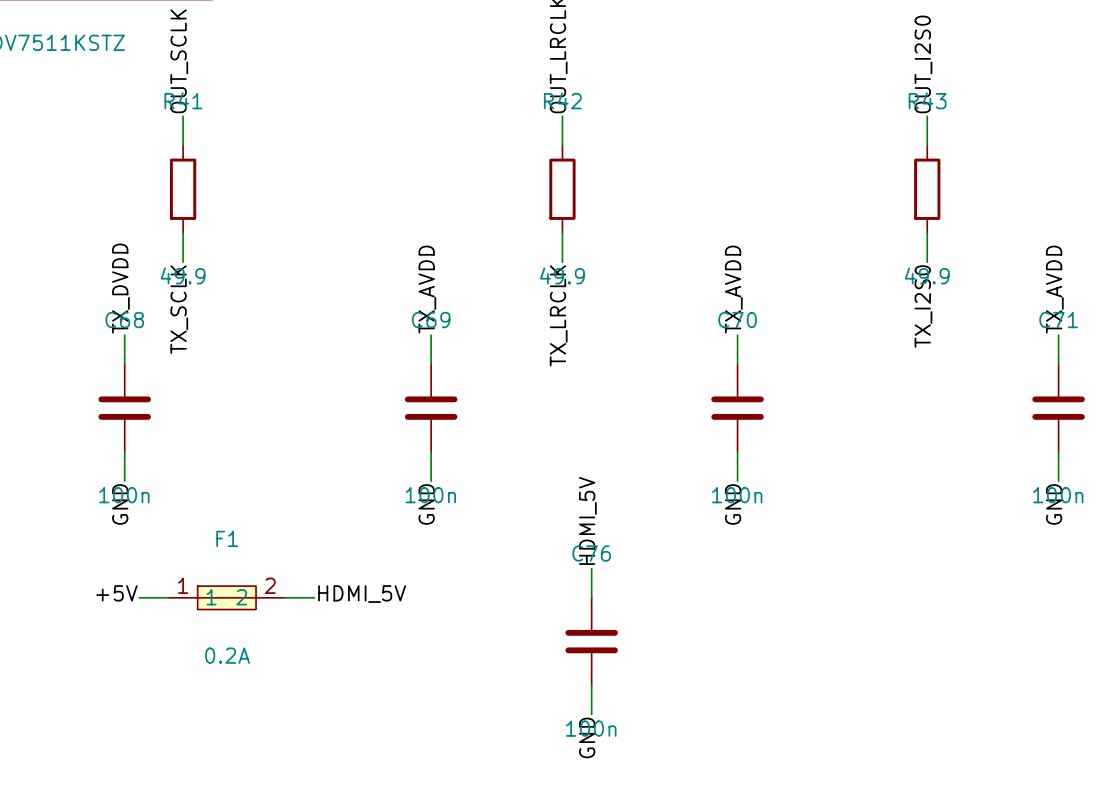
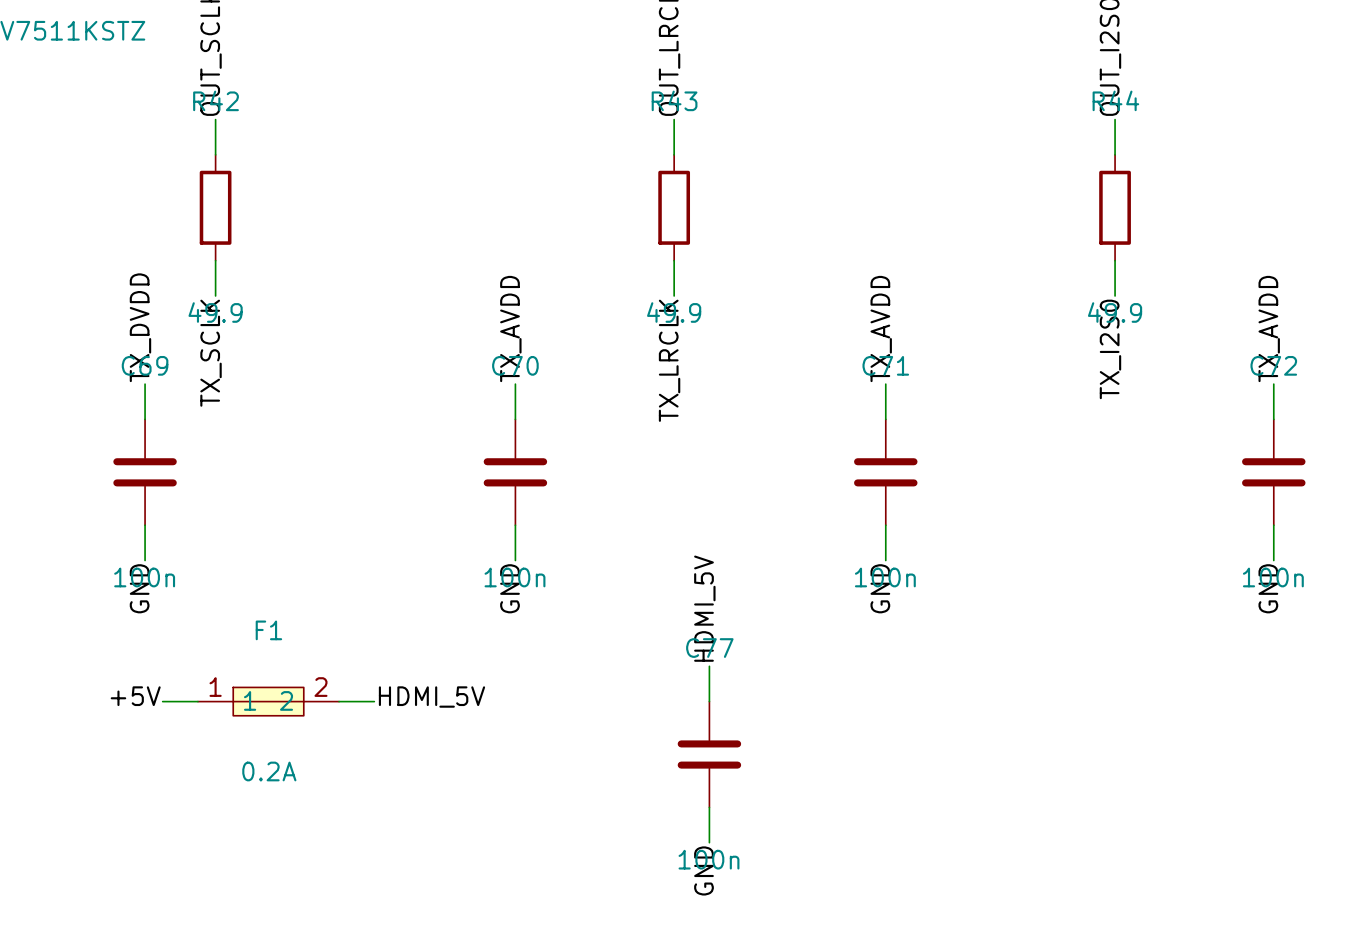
R41 name: R41 (183, 100) -> R42 (216, 100)
R42 name: R42 (562, 100) -> R43 (674, 100)
R43 name: R43 (927, 100) -> R44 (1115, 100)
C68 name: C68 (124, 320) -> C69 (145, 365)
C69 name: C69 (431, 320) -> C70 (515, 365)
C70 name: C70 (737, 320) -> C71 (885, 365)
C71 name: C71 (1058, 320) -> C72 (1273, 365)
C76 name: C76 (591, 553) -> C77 (709, 648)

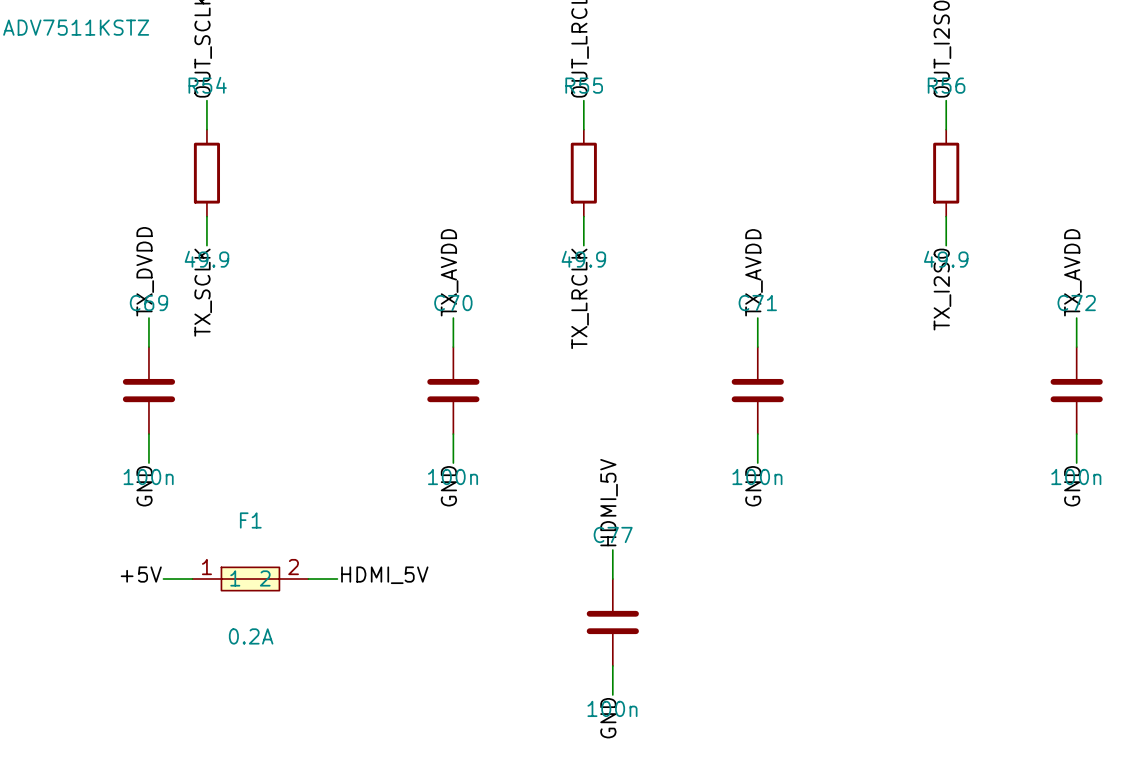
R42 name: R42 (216, 100) -> R54 (207, 85)
R43 name: R43 (674, 100) -> R55 (584, 85)
R44 name: R44 (1115, 100) -> R56 (946, 85)

